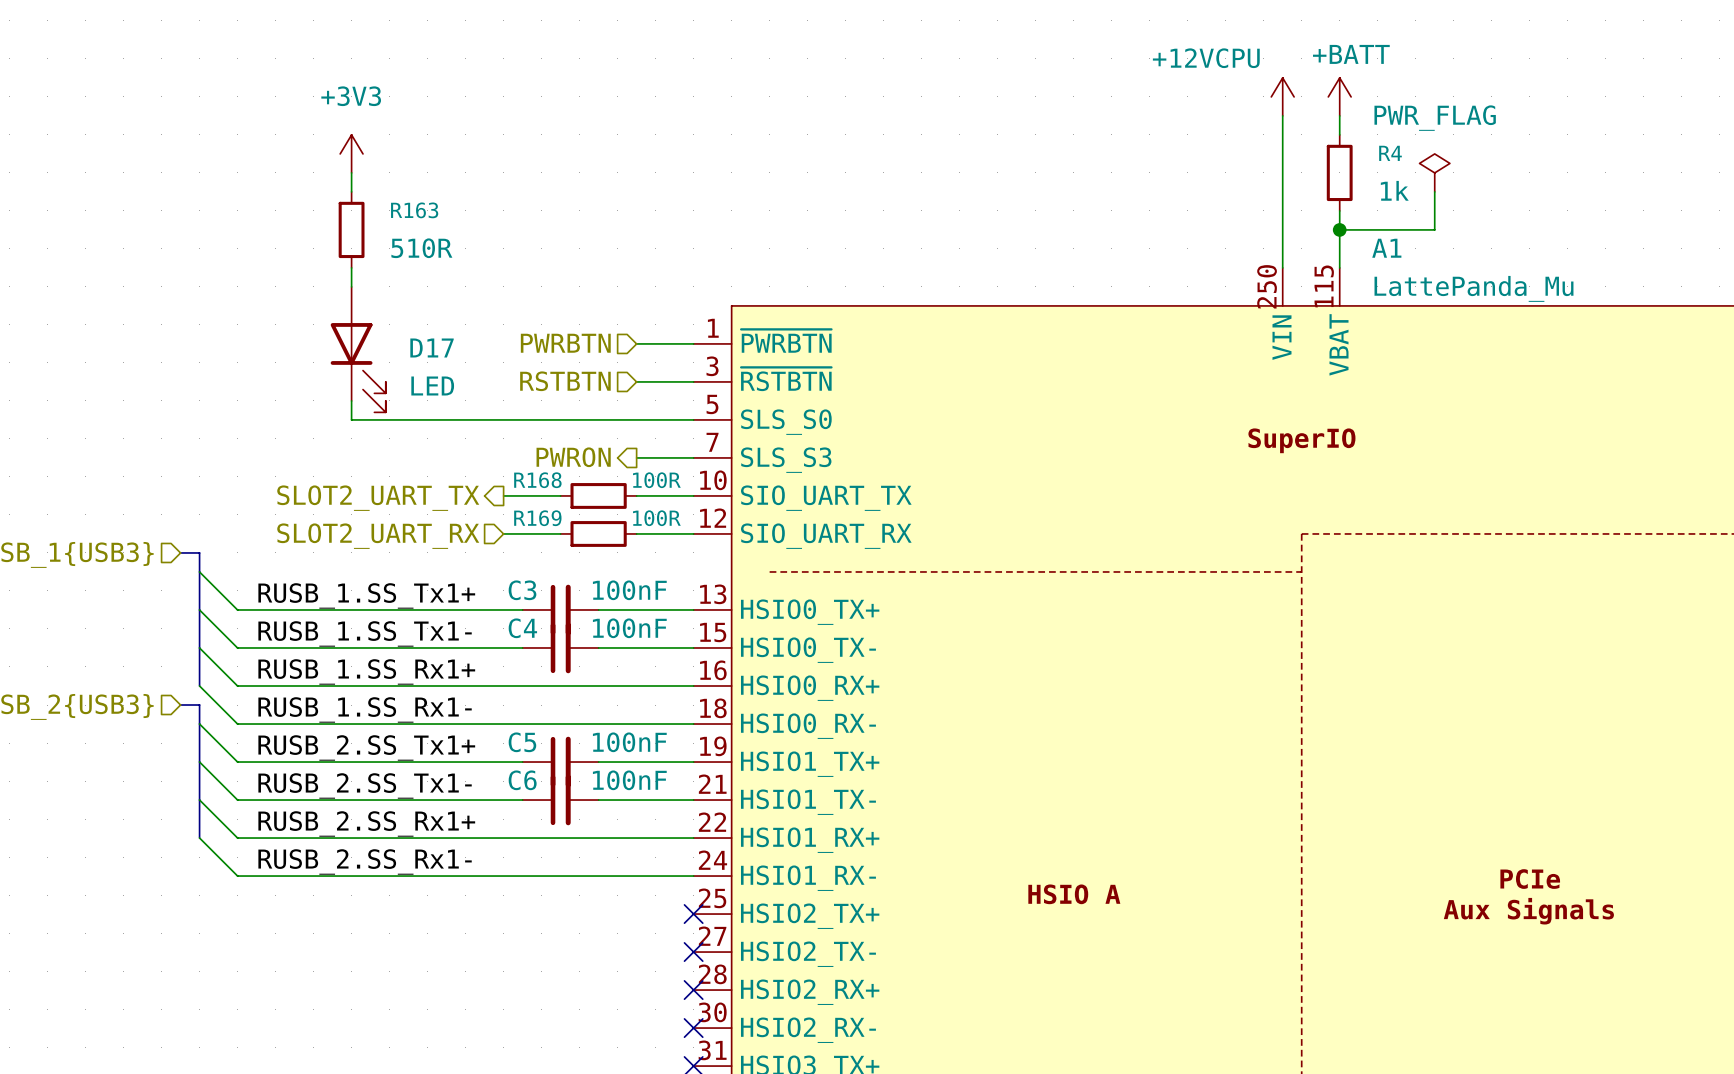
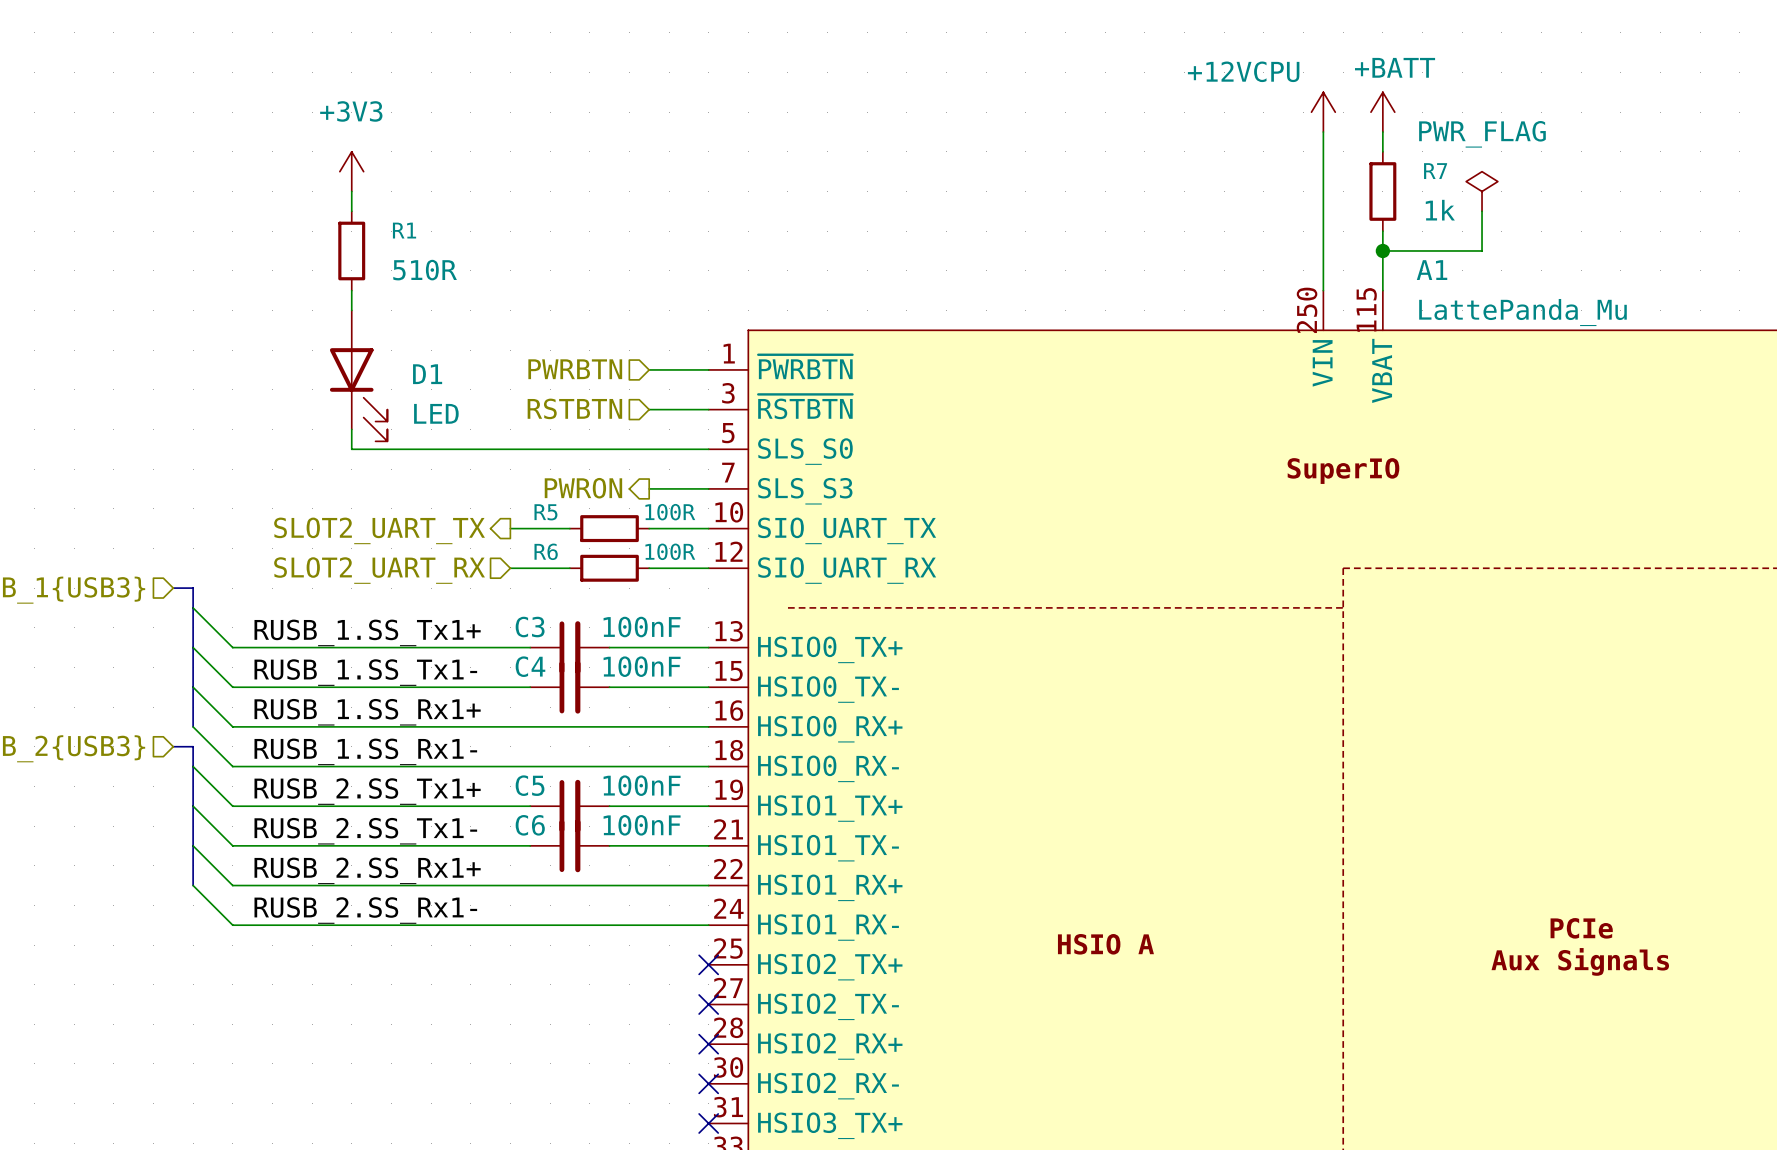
R4 name: R4 (1390, 153) -> R7 (1435, 171)
R163 name: R163 (414, 210) -> R1 (404, 230)
D17 name: D17 (432, 347) -> D1 (427, 374)
R168 name: R168 (537, 480) -> R5 (545, 512)
R169 name: R169 (537, 518) -> R6 (546, 551)

